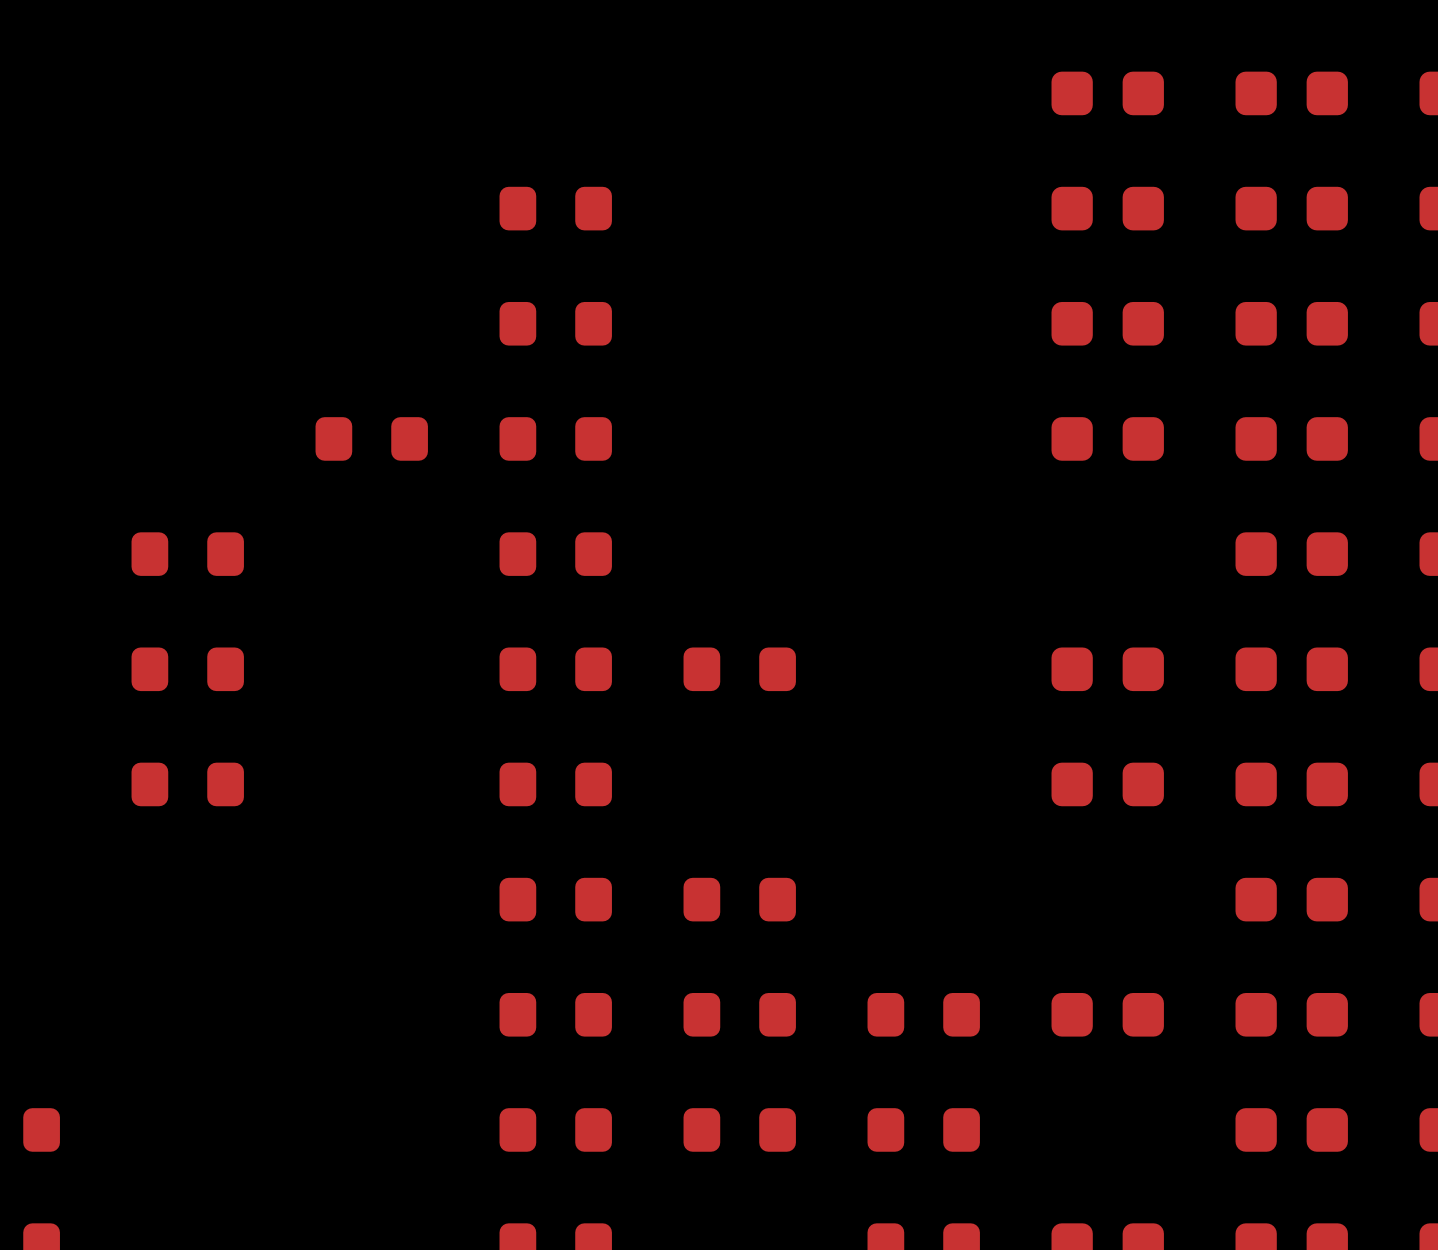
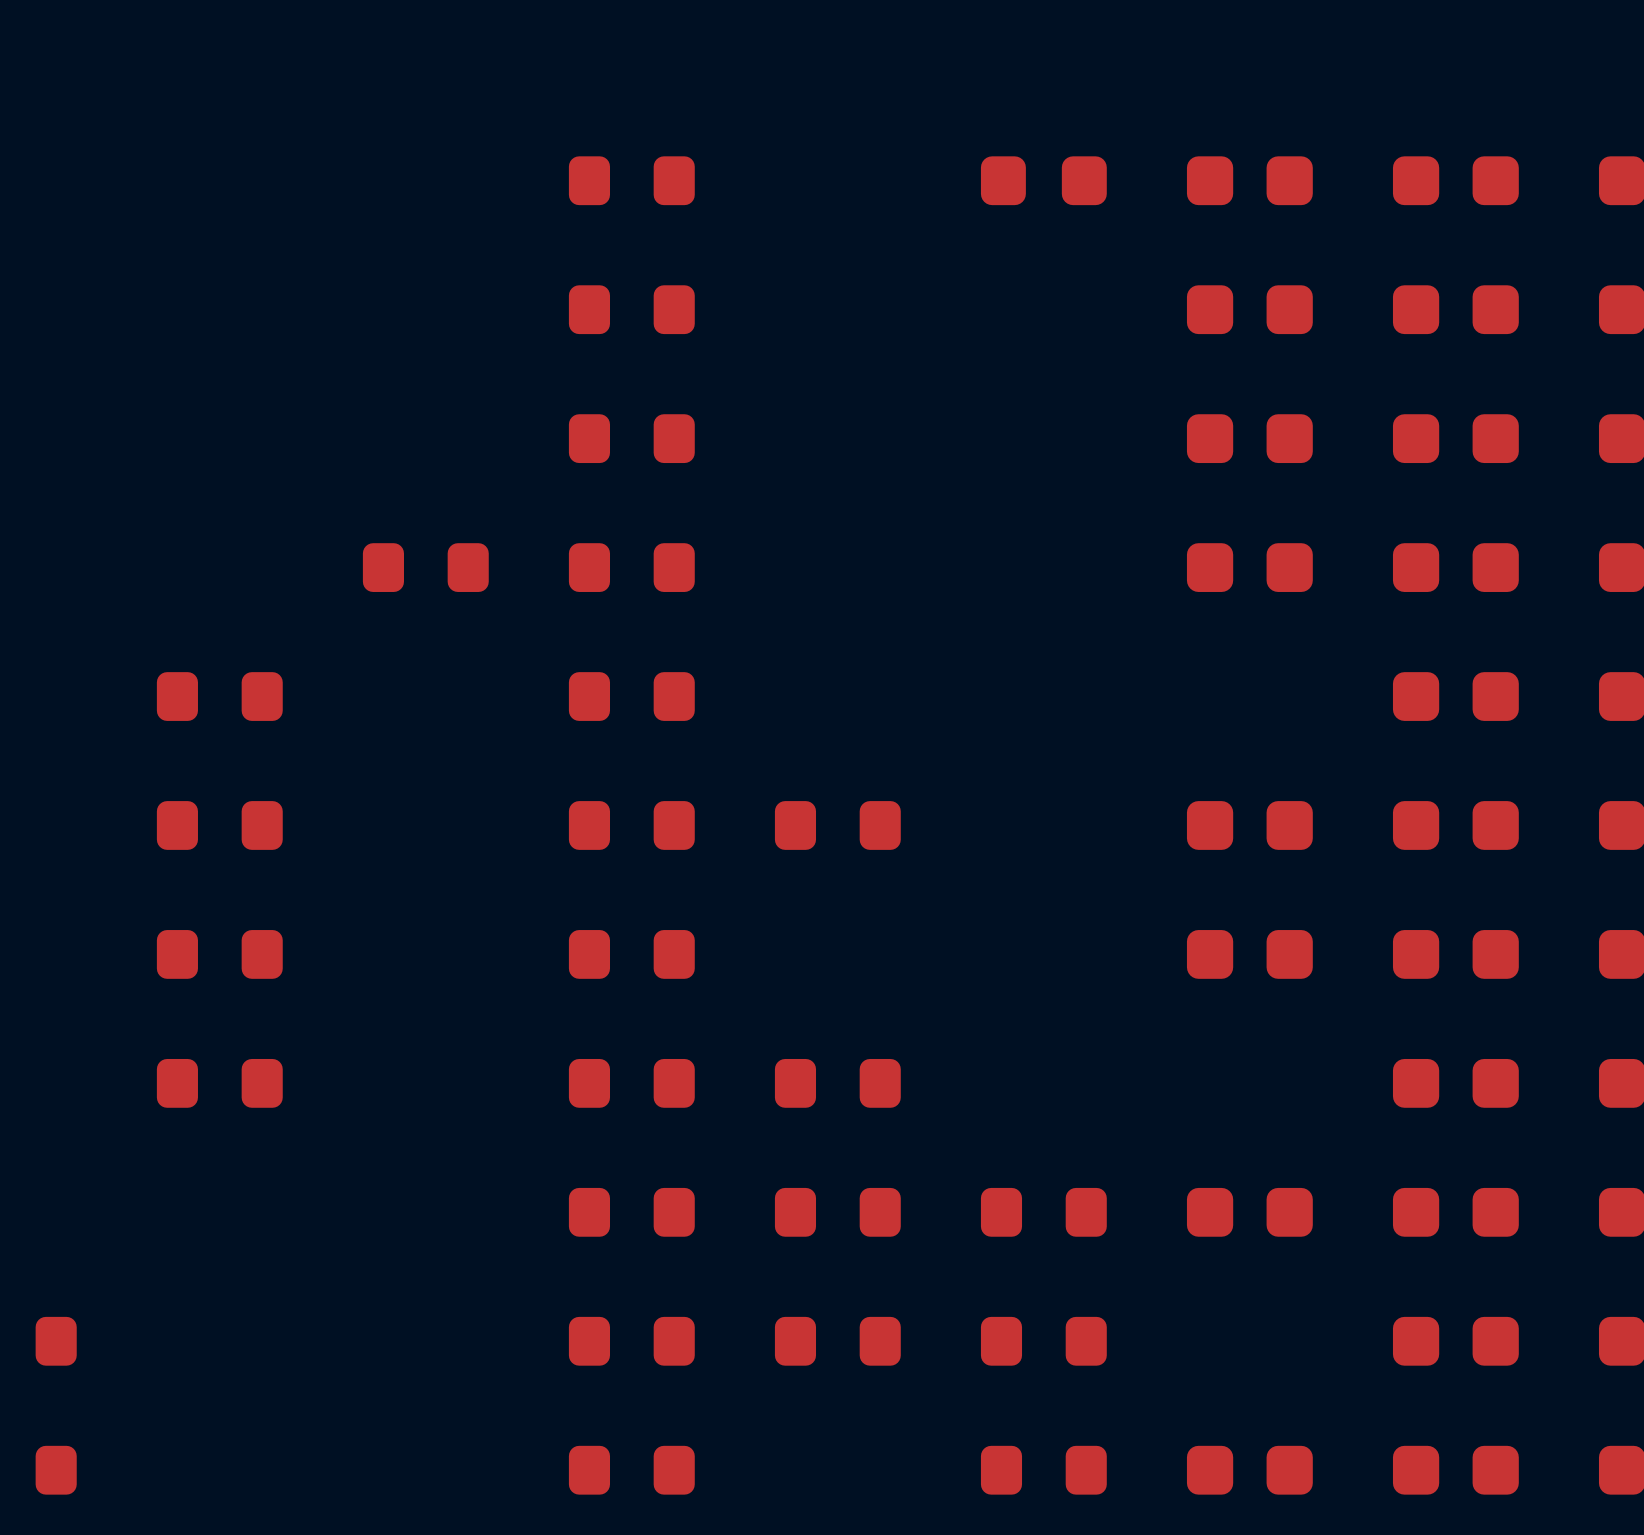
part: none -> (631, 180)
part: none -> (1043, 180)
part: none -> (219, 1083)

